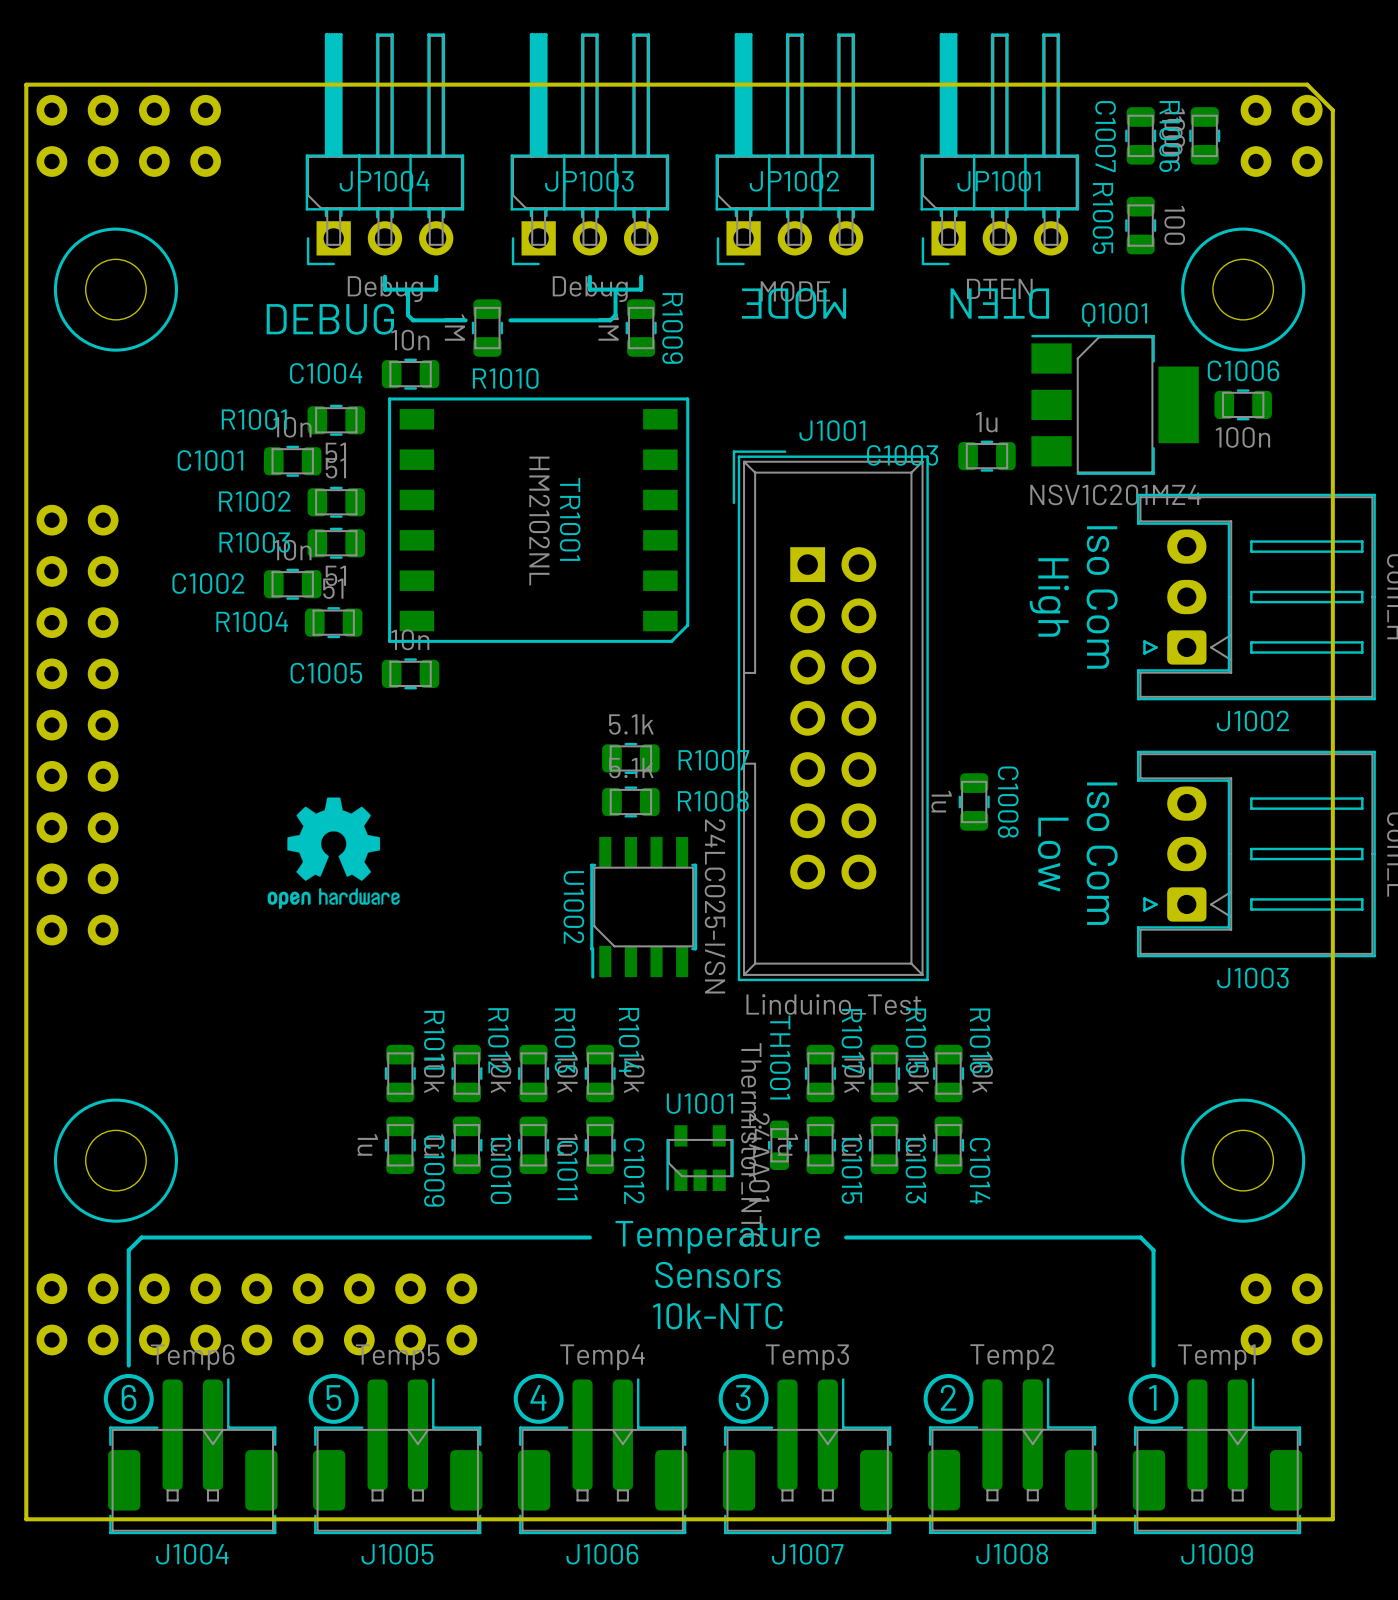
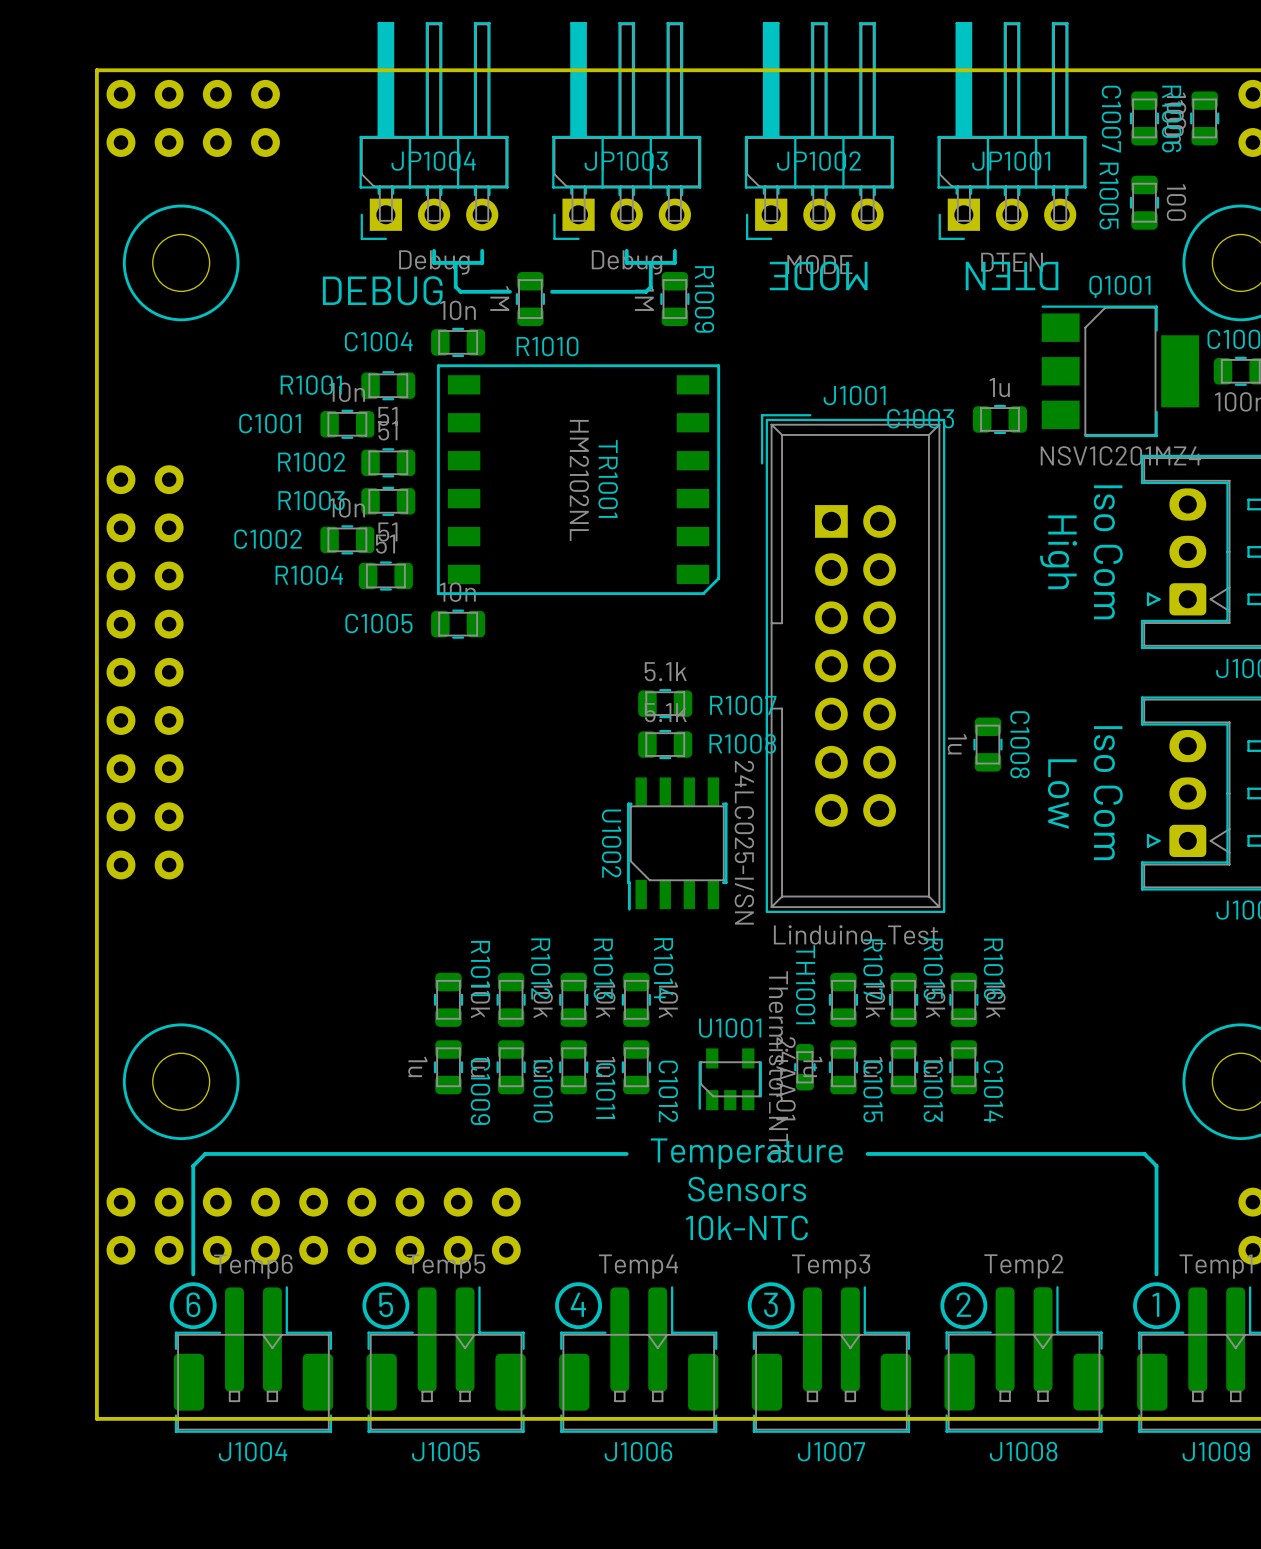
drawing: [267, 797, 400, 910] -> none

